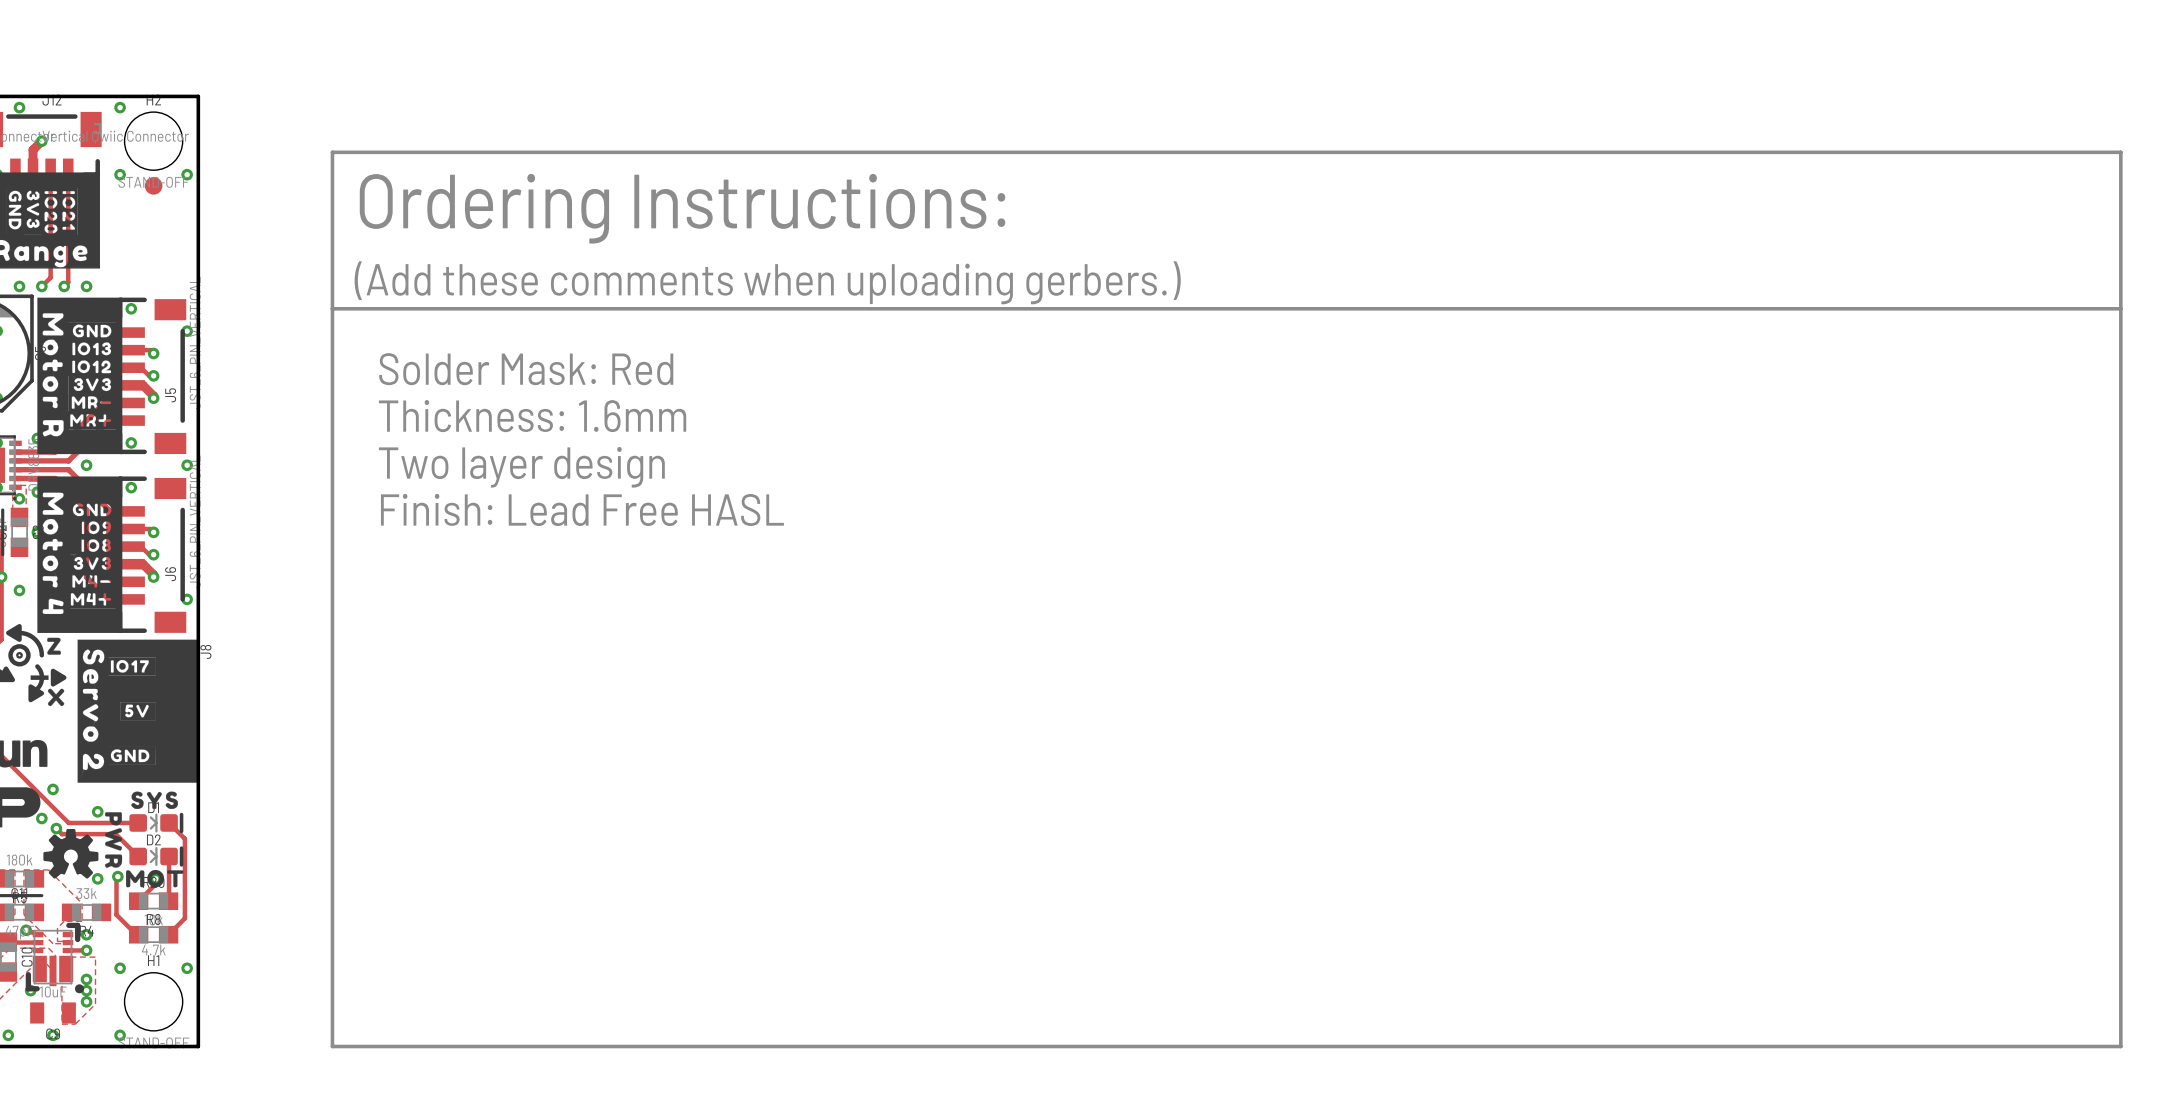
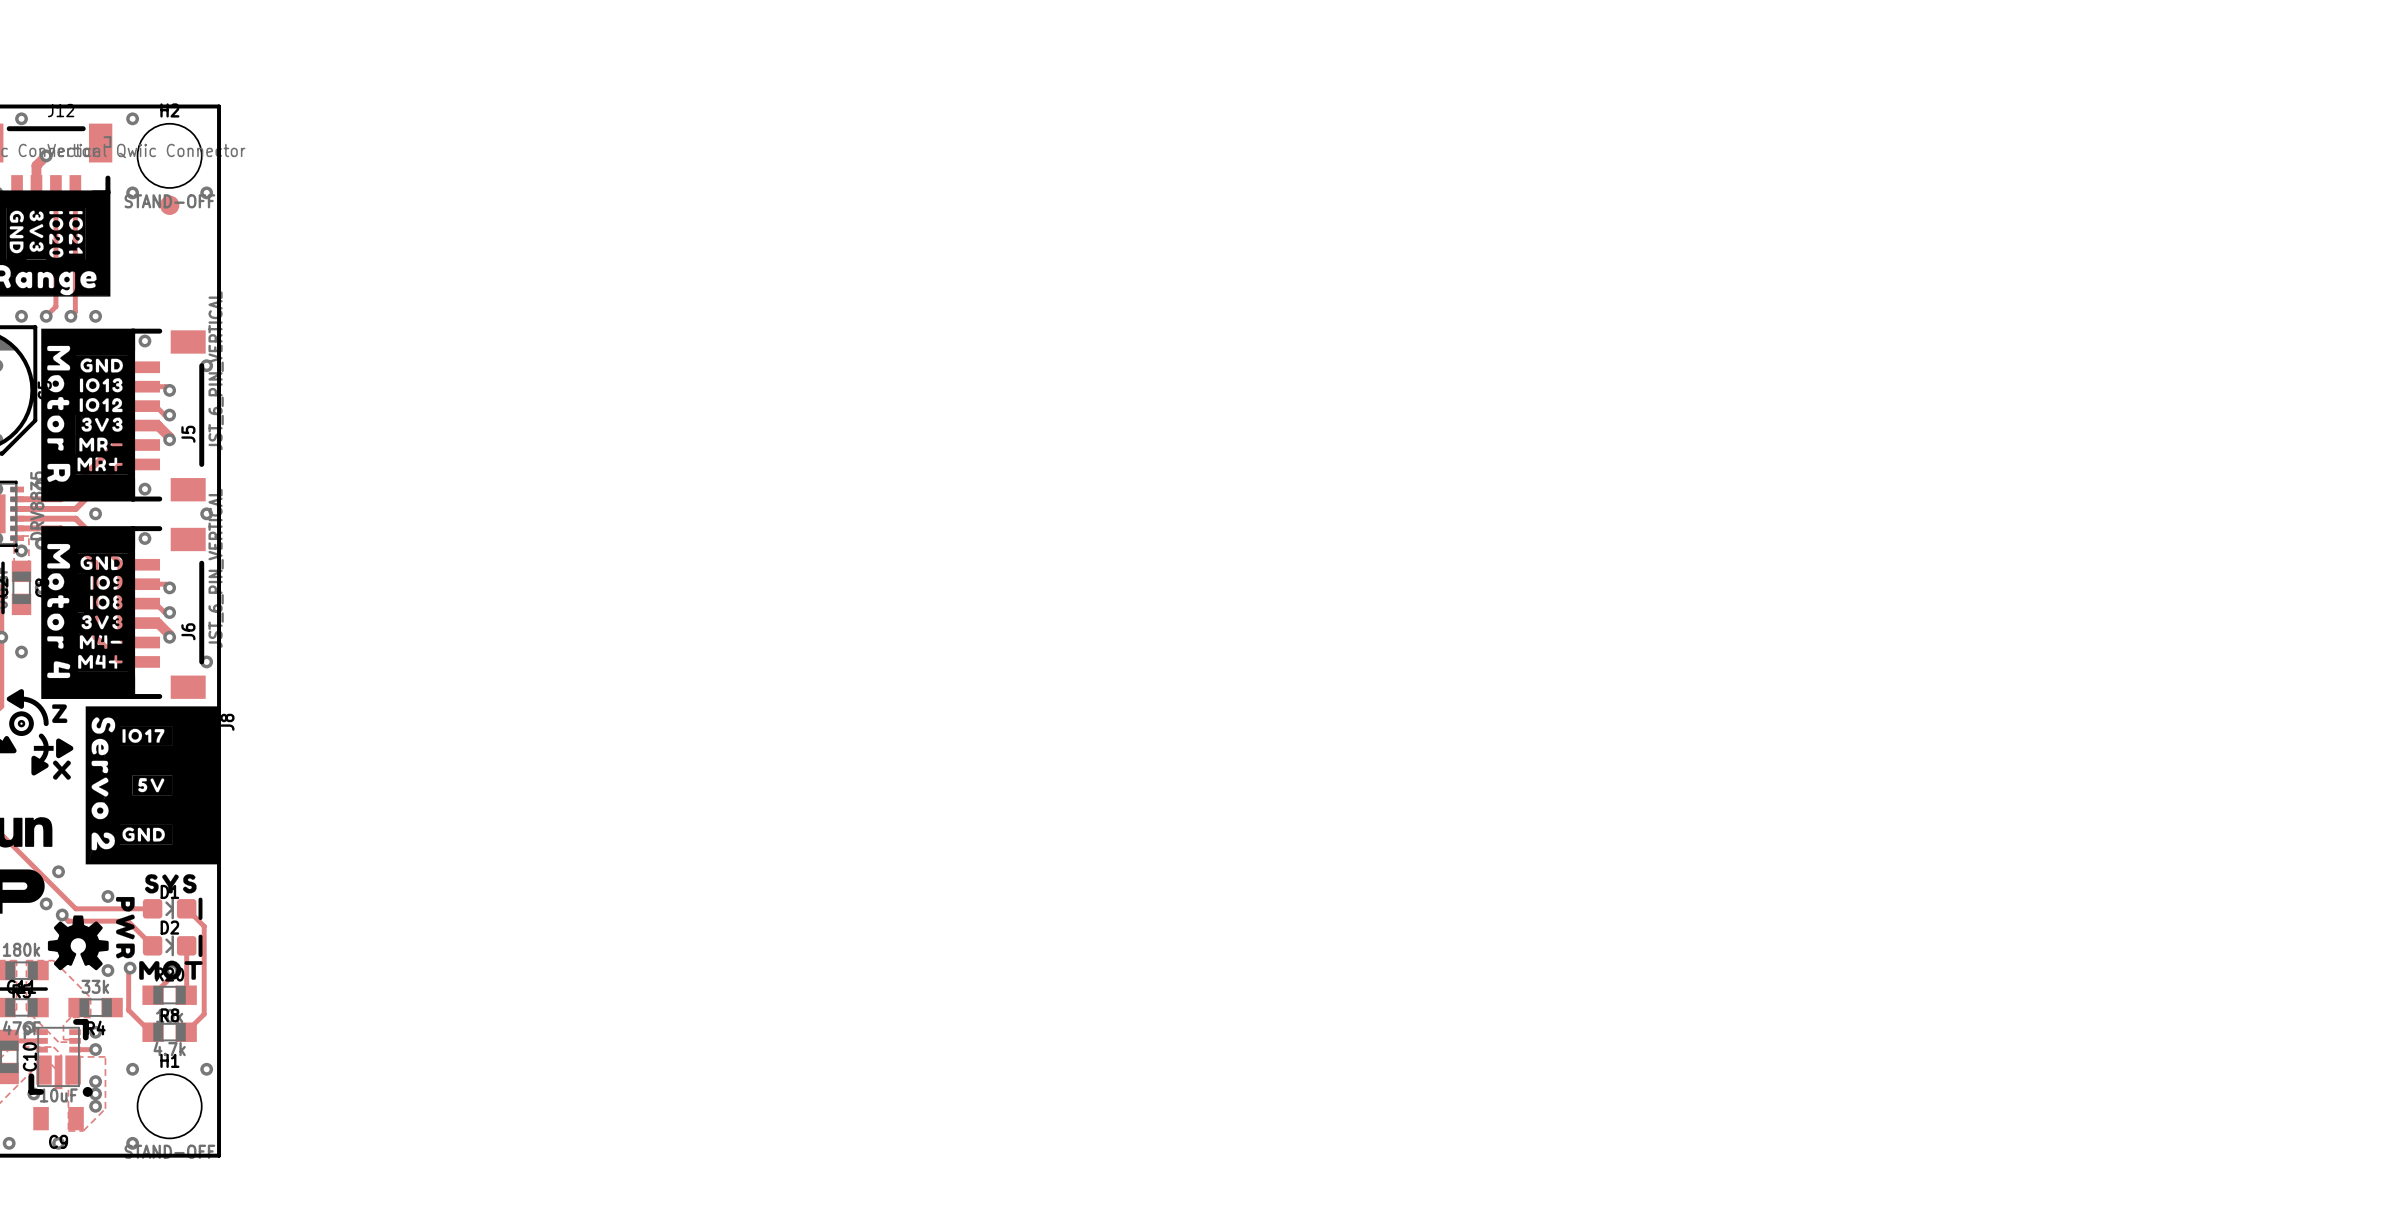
drawing: [330, 150, 2123, 1049] -> none
text: Solder Mask: Red (526, 369) -> none
text: Thickness: 1.6mm (532, 416) -> none
text: Two layer design (521, 467) -> none
text: Finish: Lead Free HASL (582, 509) -> none

